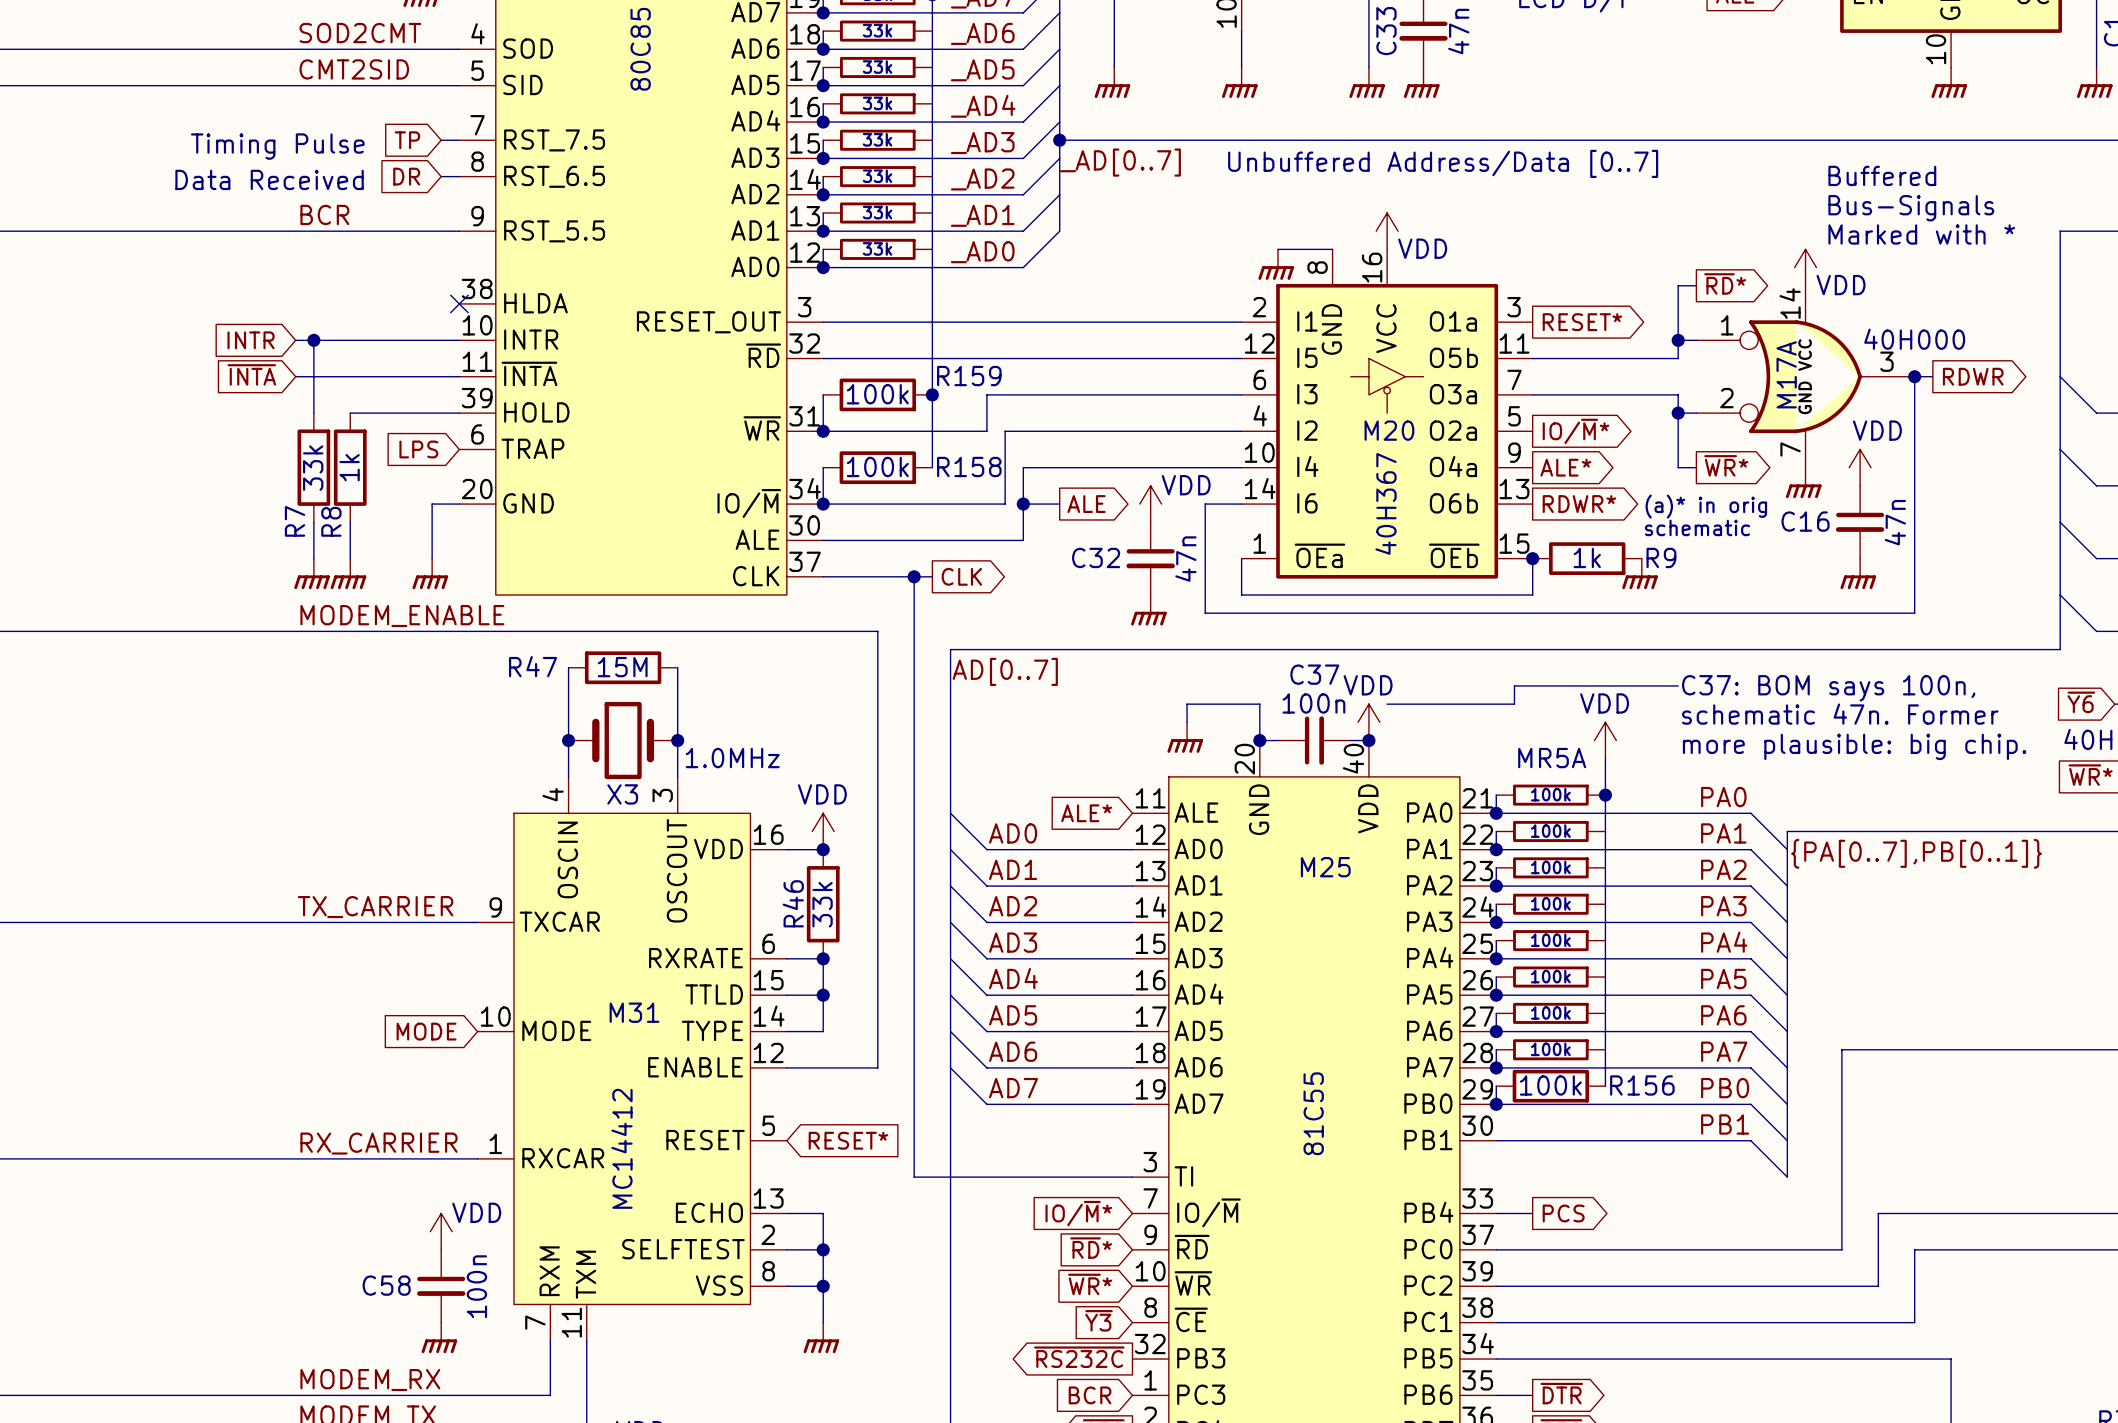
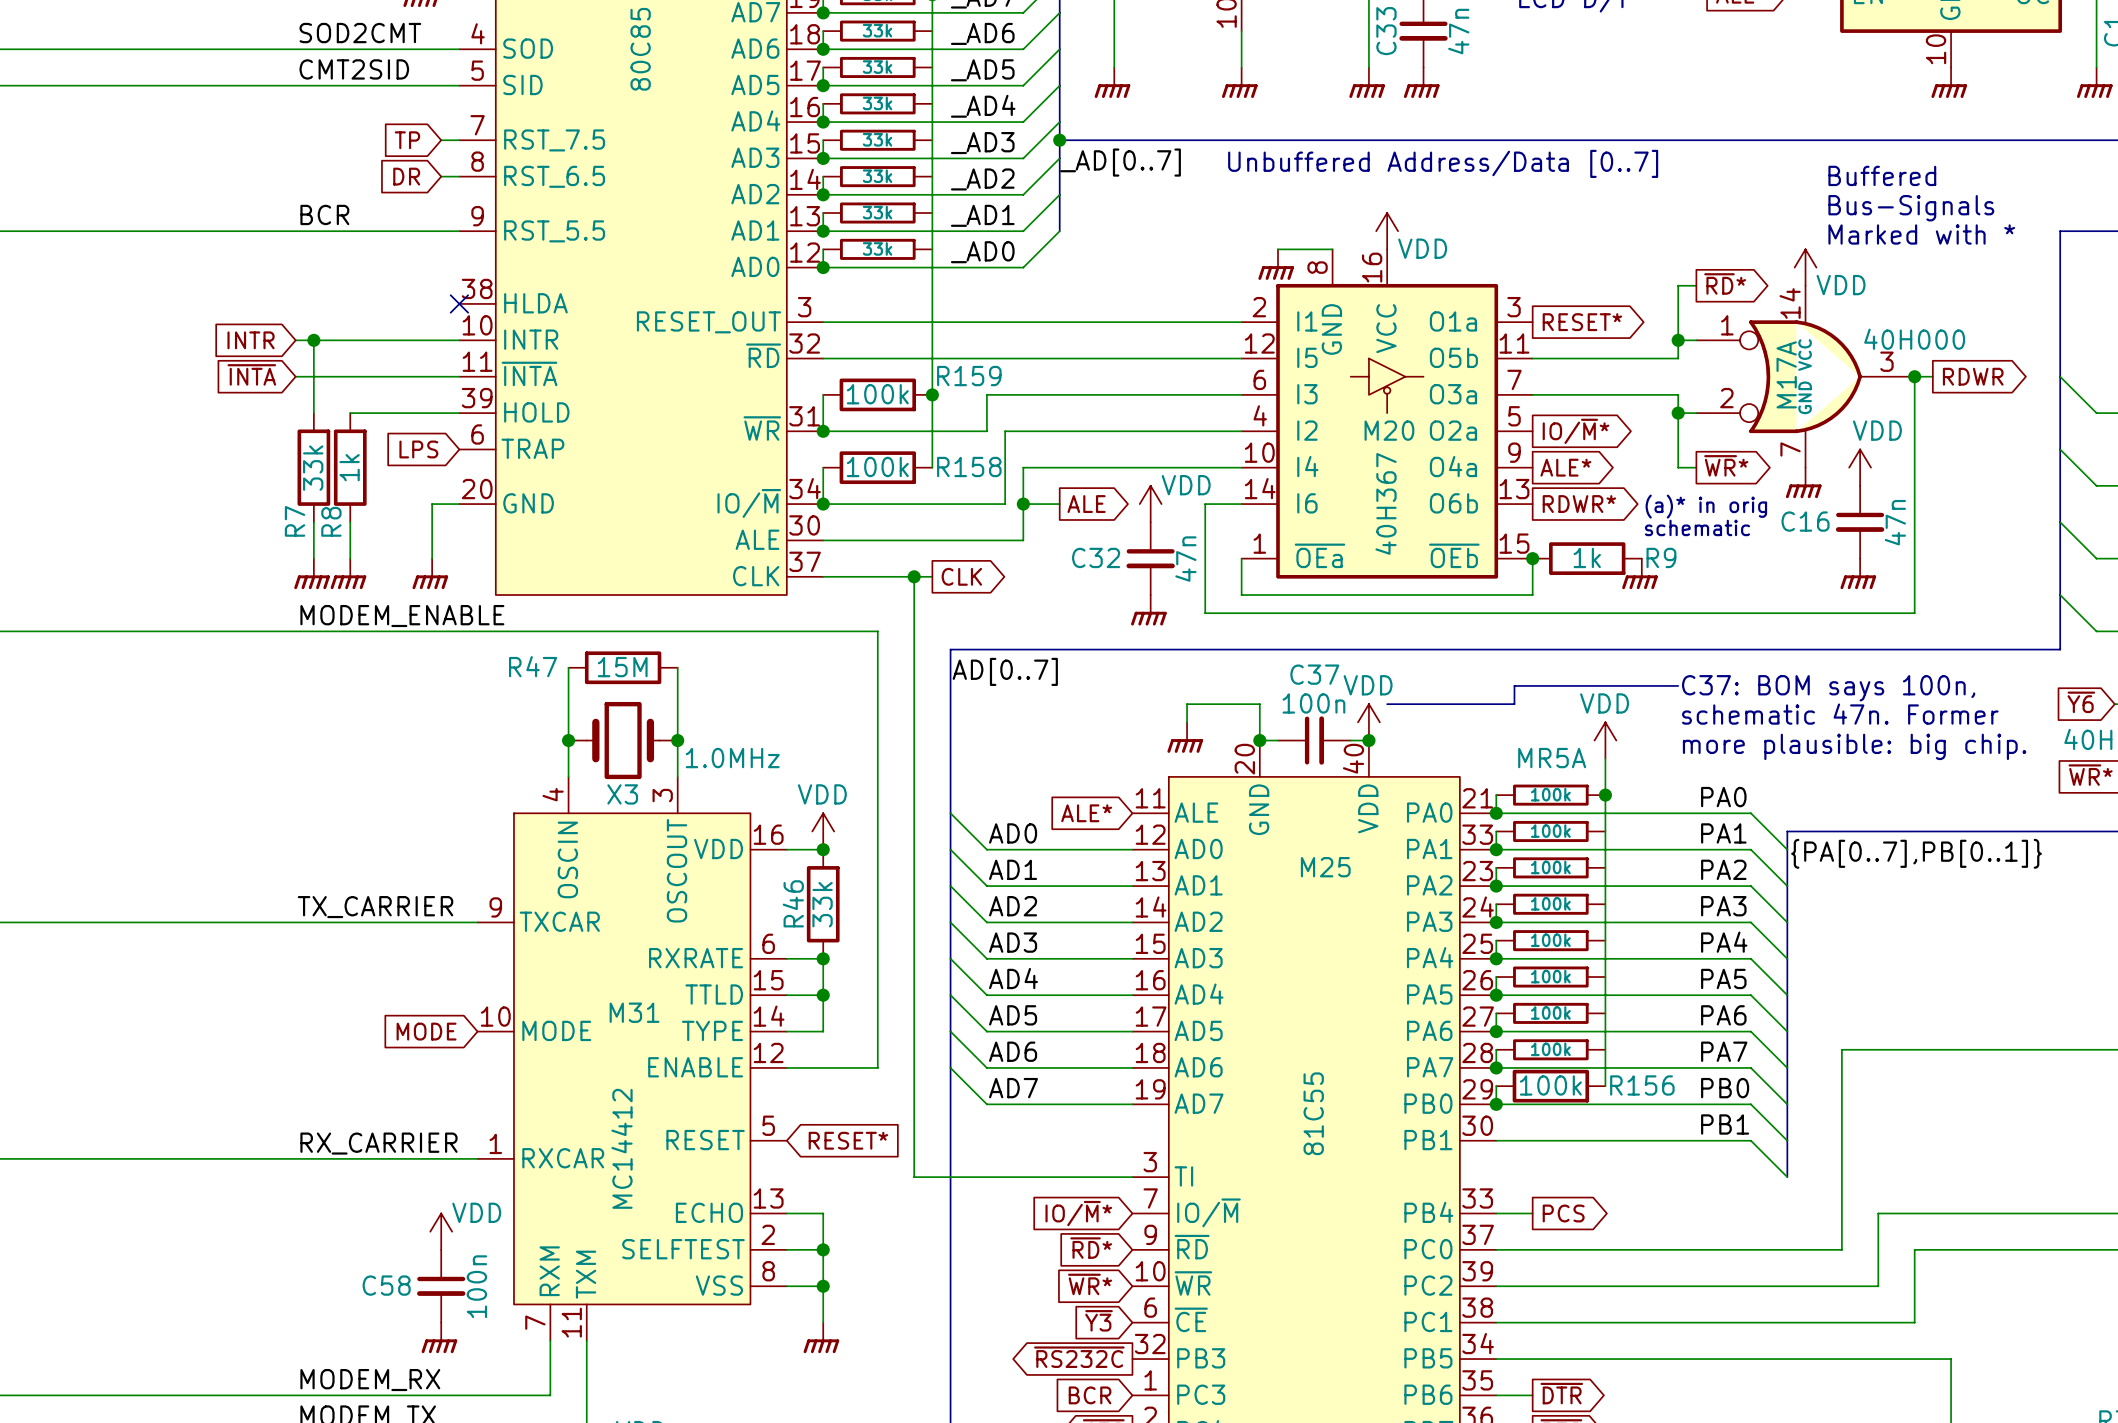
text: Timing Pulse (277, 146) -> none
text: Data Received (269, 179) -> none
M25 pin number: 22 (1477, 834) -> 33 (1477, 834)
M25 pin number: 8 (1150, 1307) -> 6 (1150, 1307)

